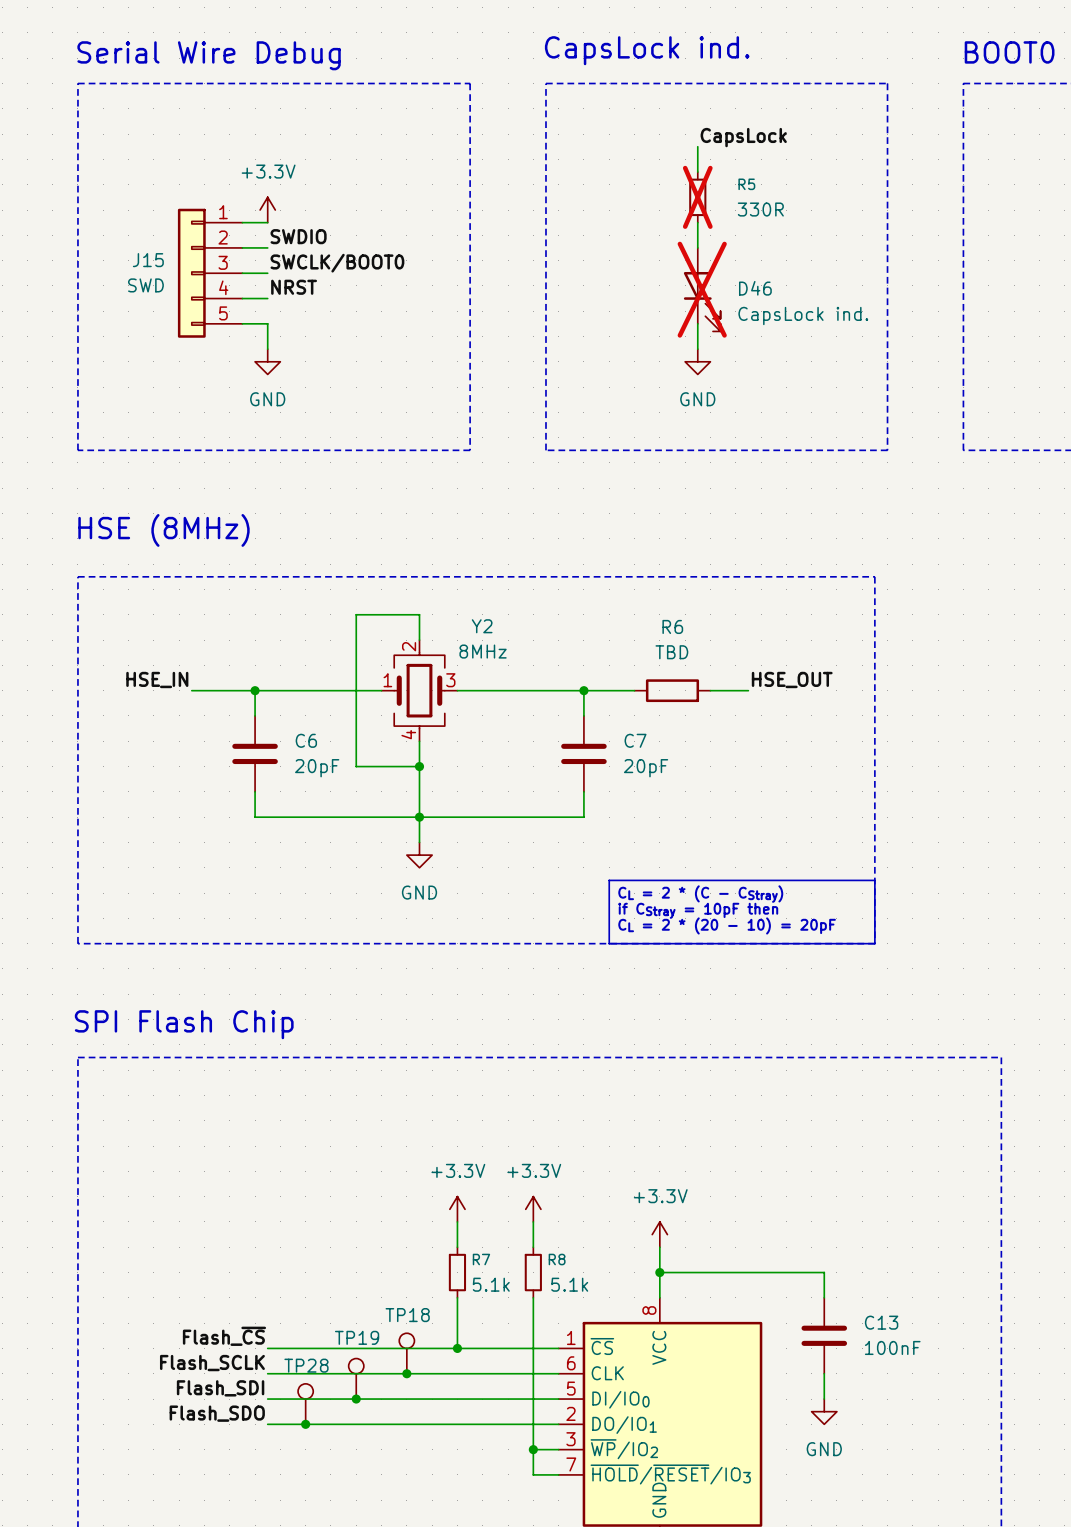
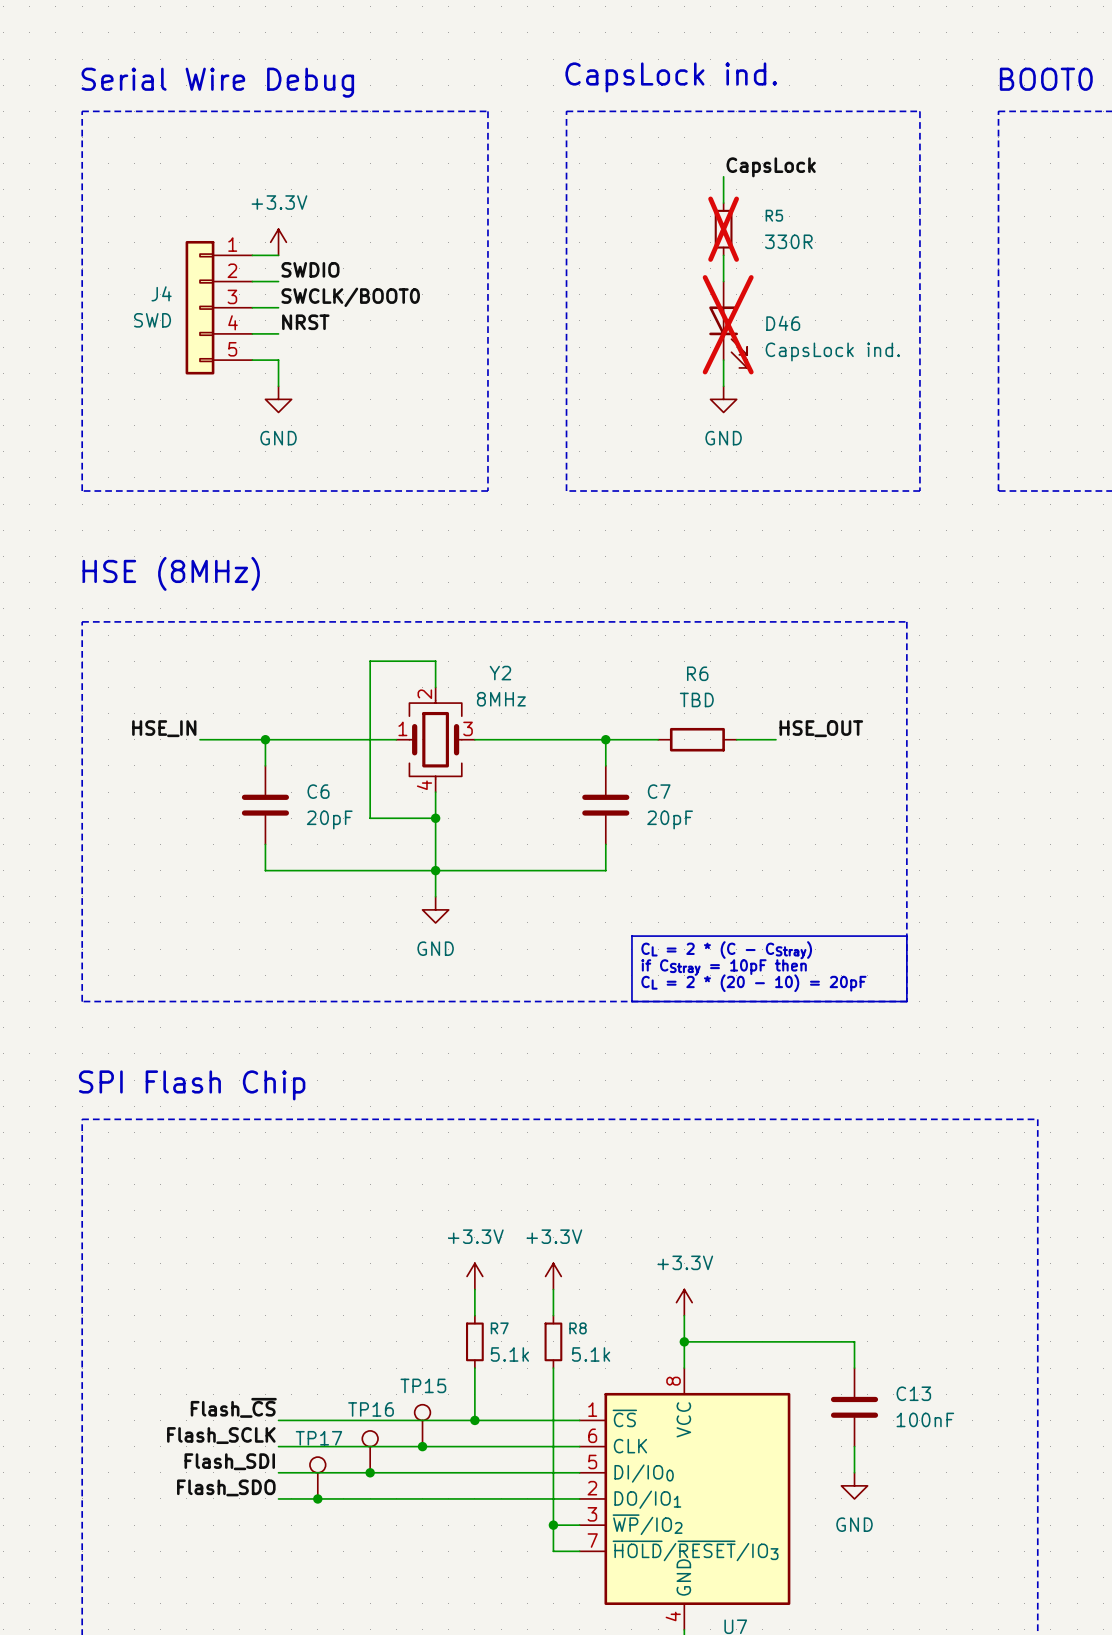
J15 name: J15 (148, 260) -> J4 (161, 293)
TP18 name: TP18 (407, 1315) -> TP15 (423, 1385)
TP19 name: TP19 (357, 1337) -> TP16 (371, 1409)
TP28 name: TP28 (306, 1365) -> TP17 (318, 1438)

